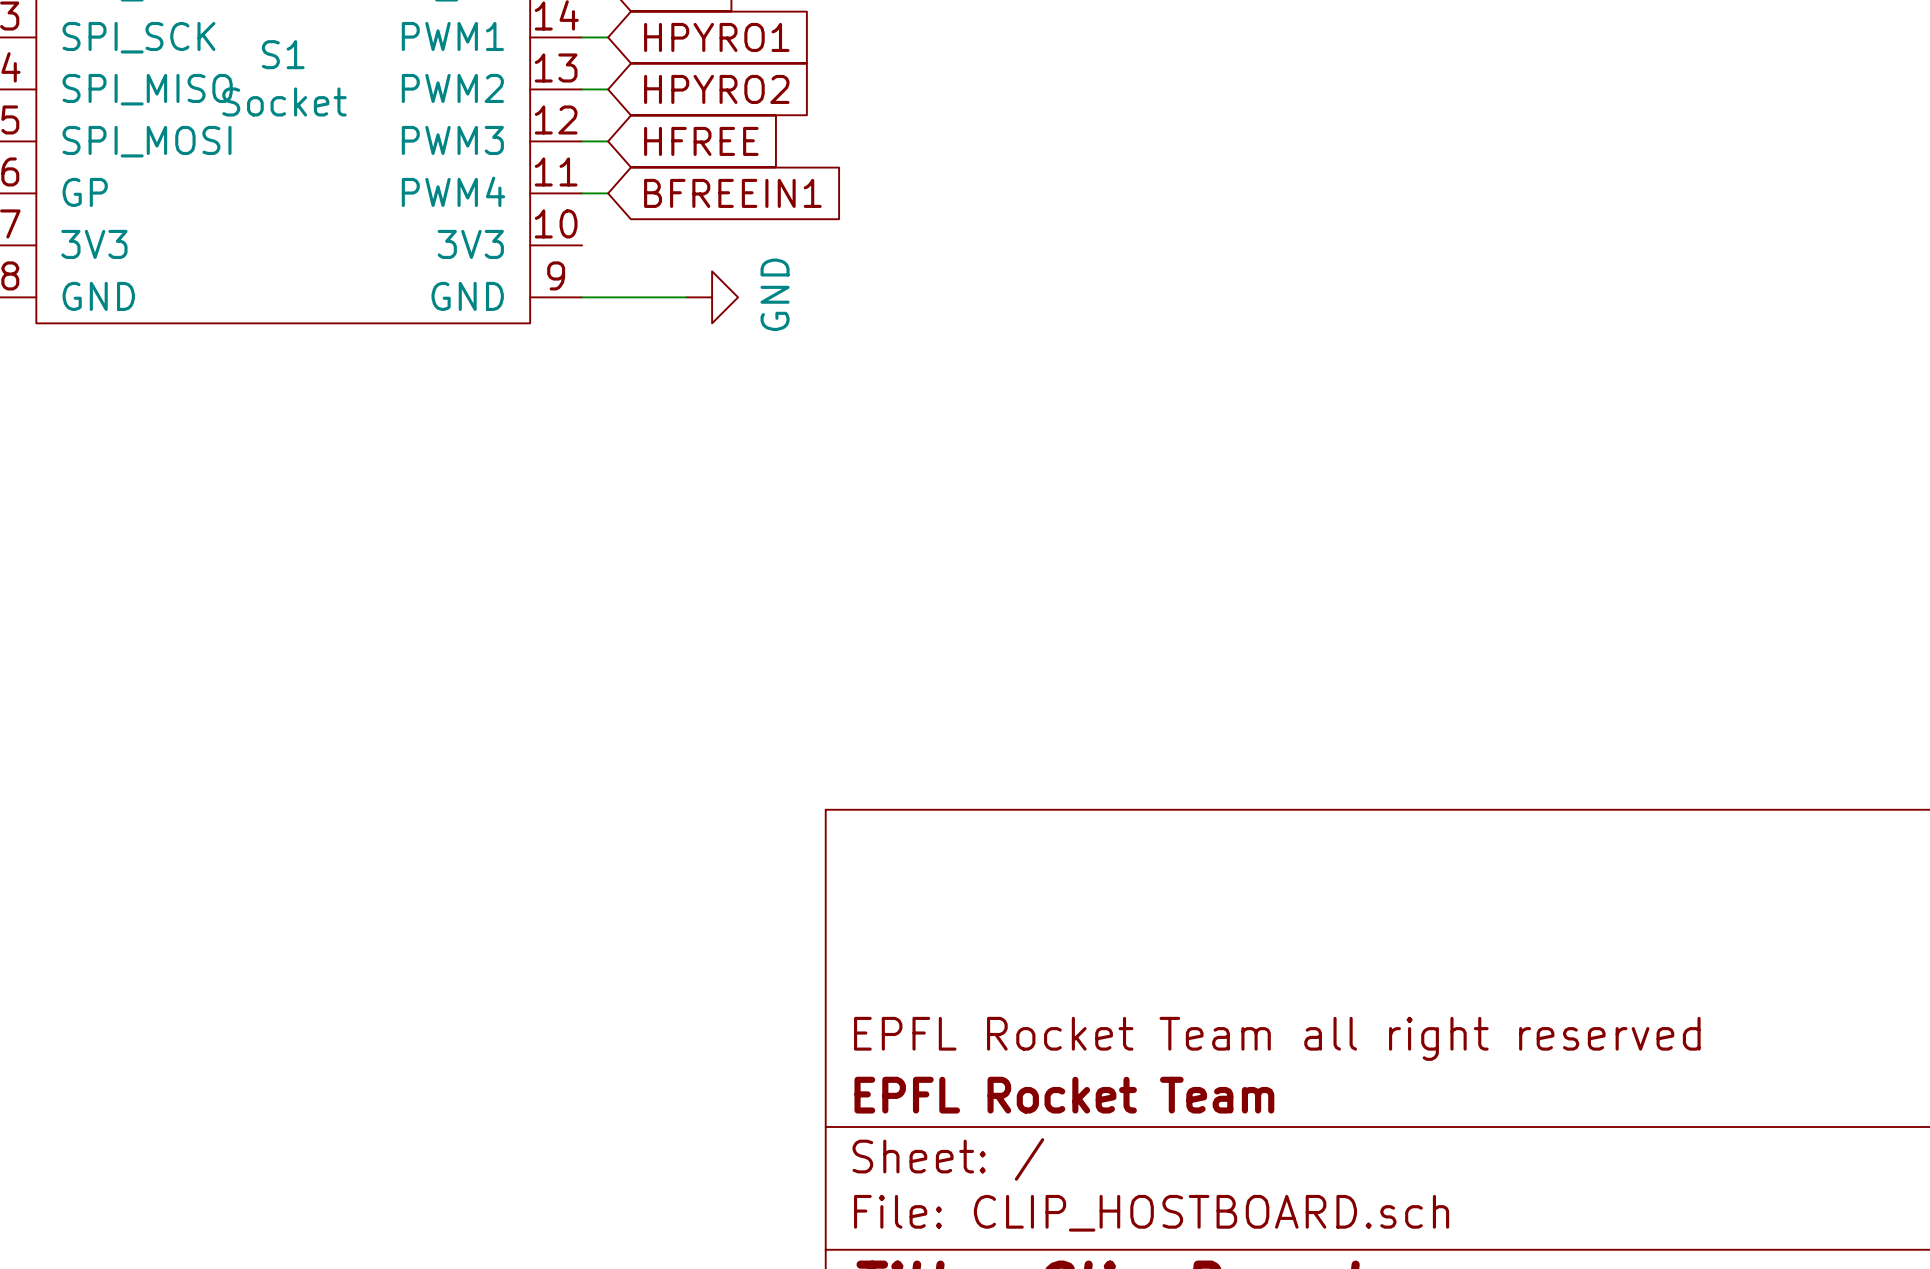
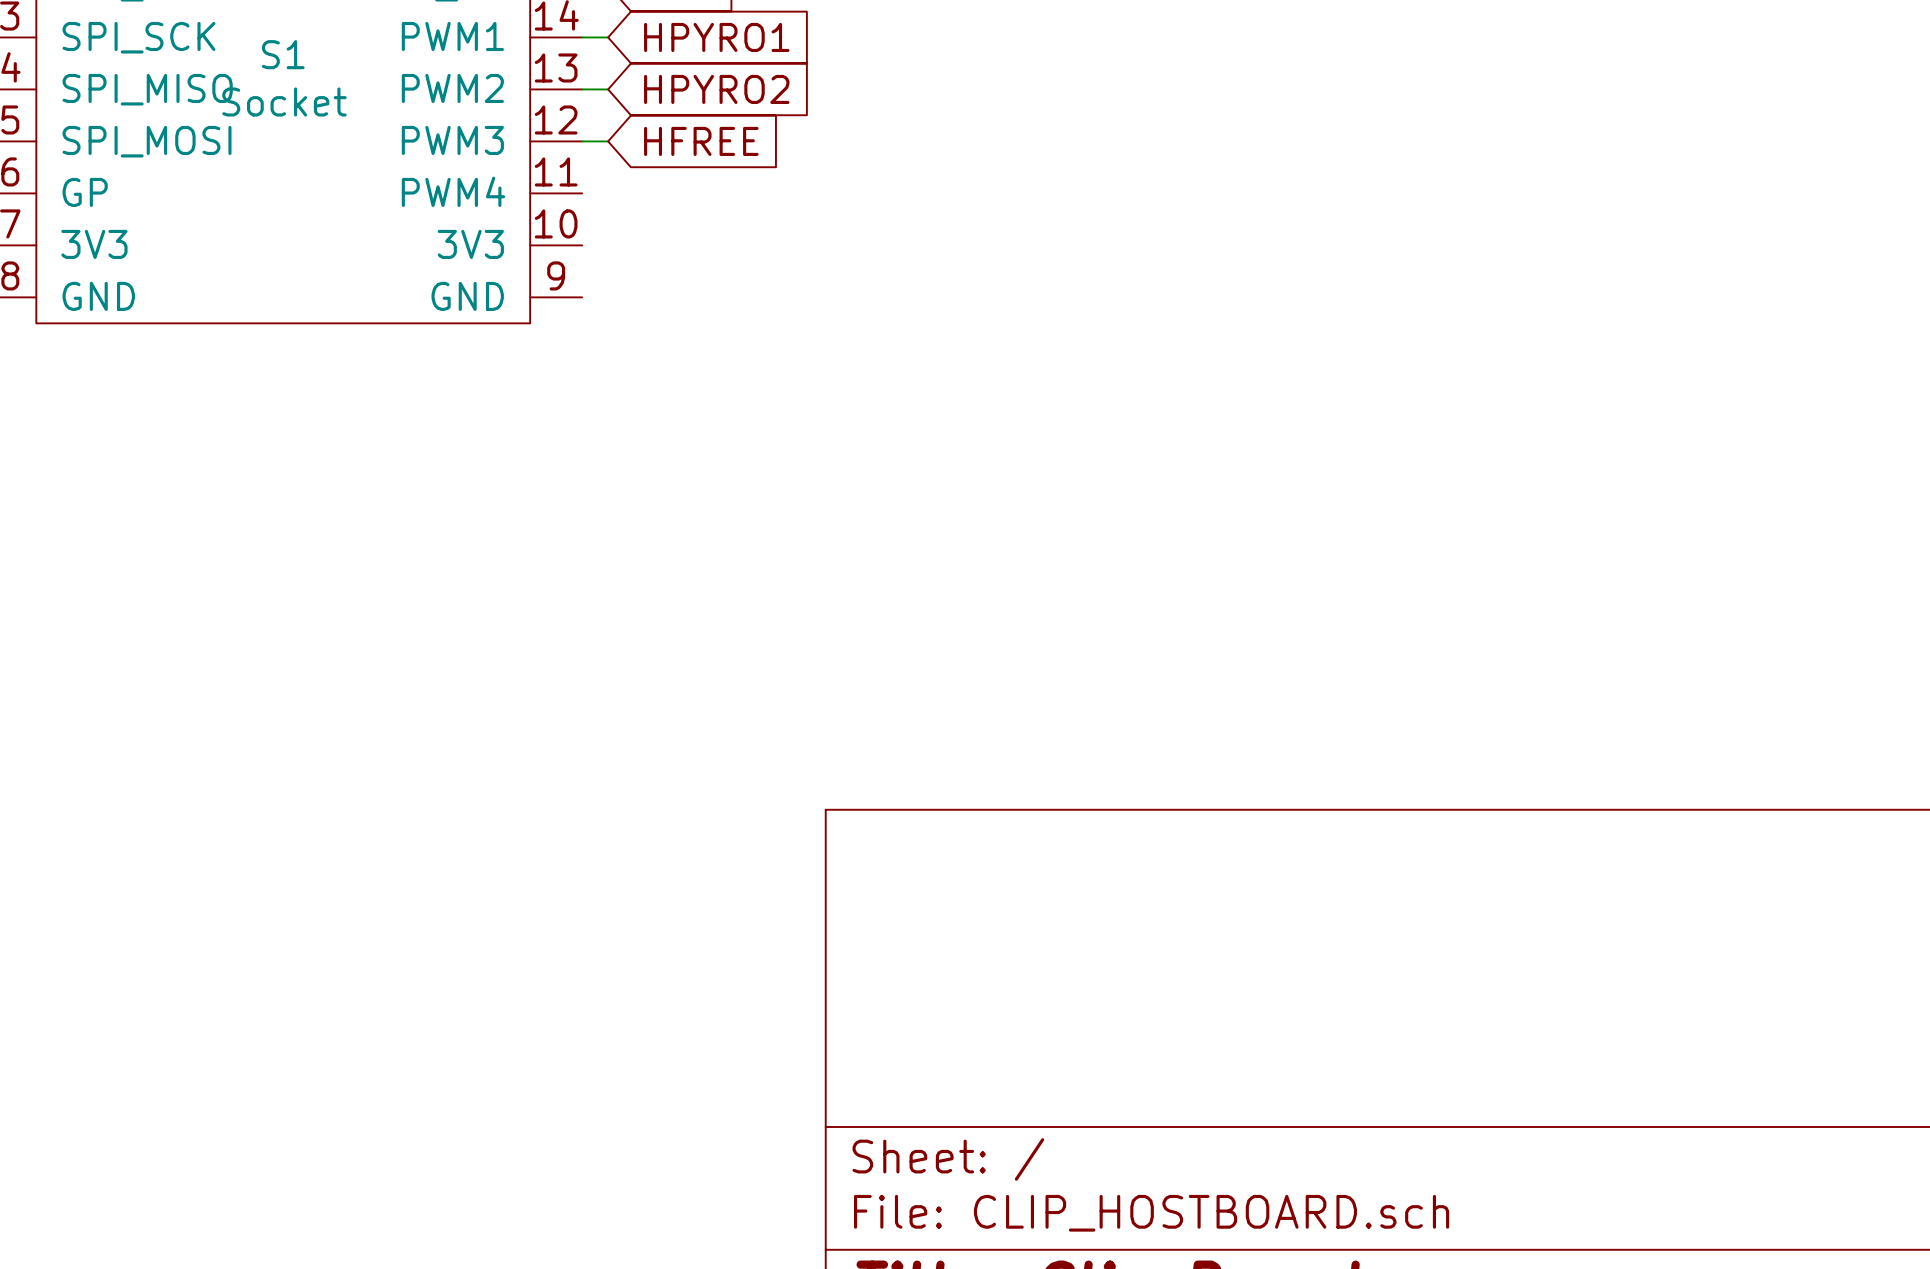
wire: (582, 193) (608, 193) -> none
global label: BFREEIN1 (732, 193) -> none
wire: (582, 297) (686, 297) -> none
power symbol: GND (712, 297) -> none
title block: EPFL Rocket Team all right reserved (1277, 1038) -> none
title block: EPFL Rocket Team (1064, 1095) -> none

